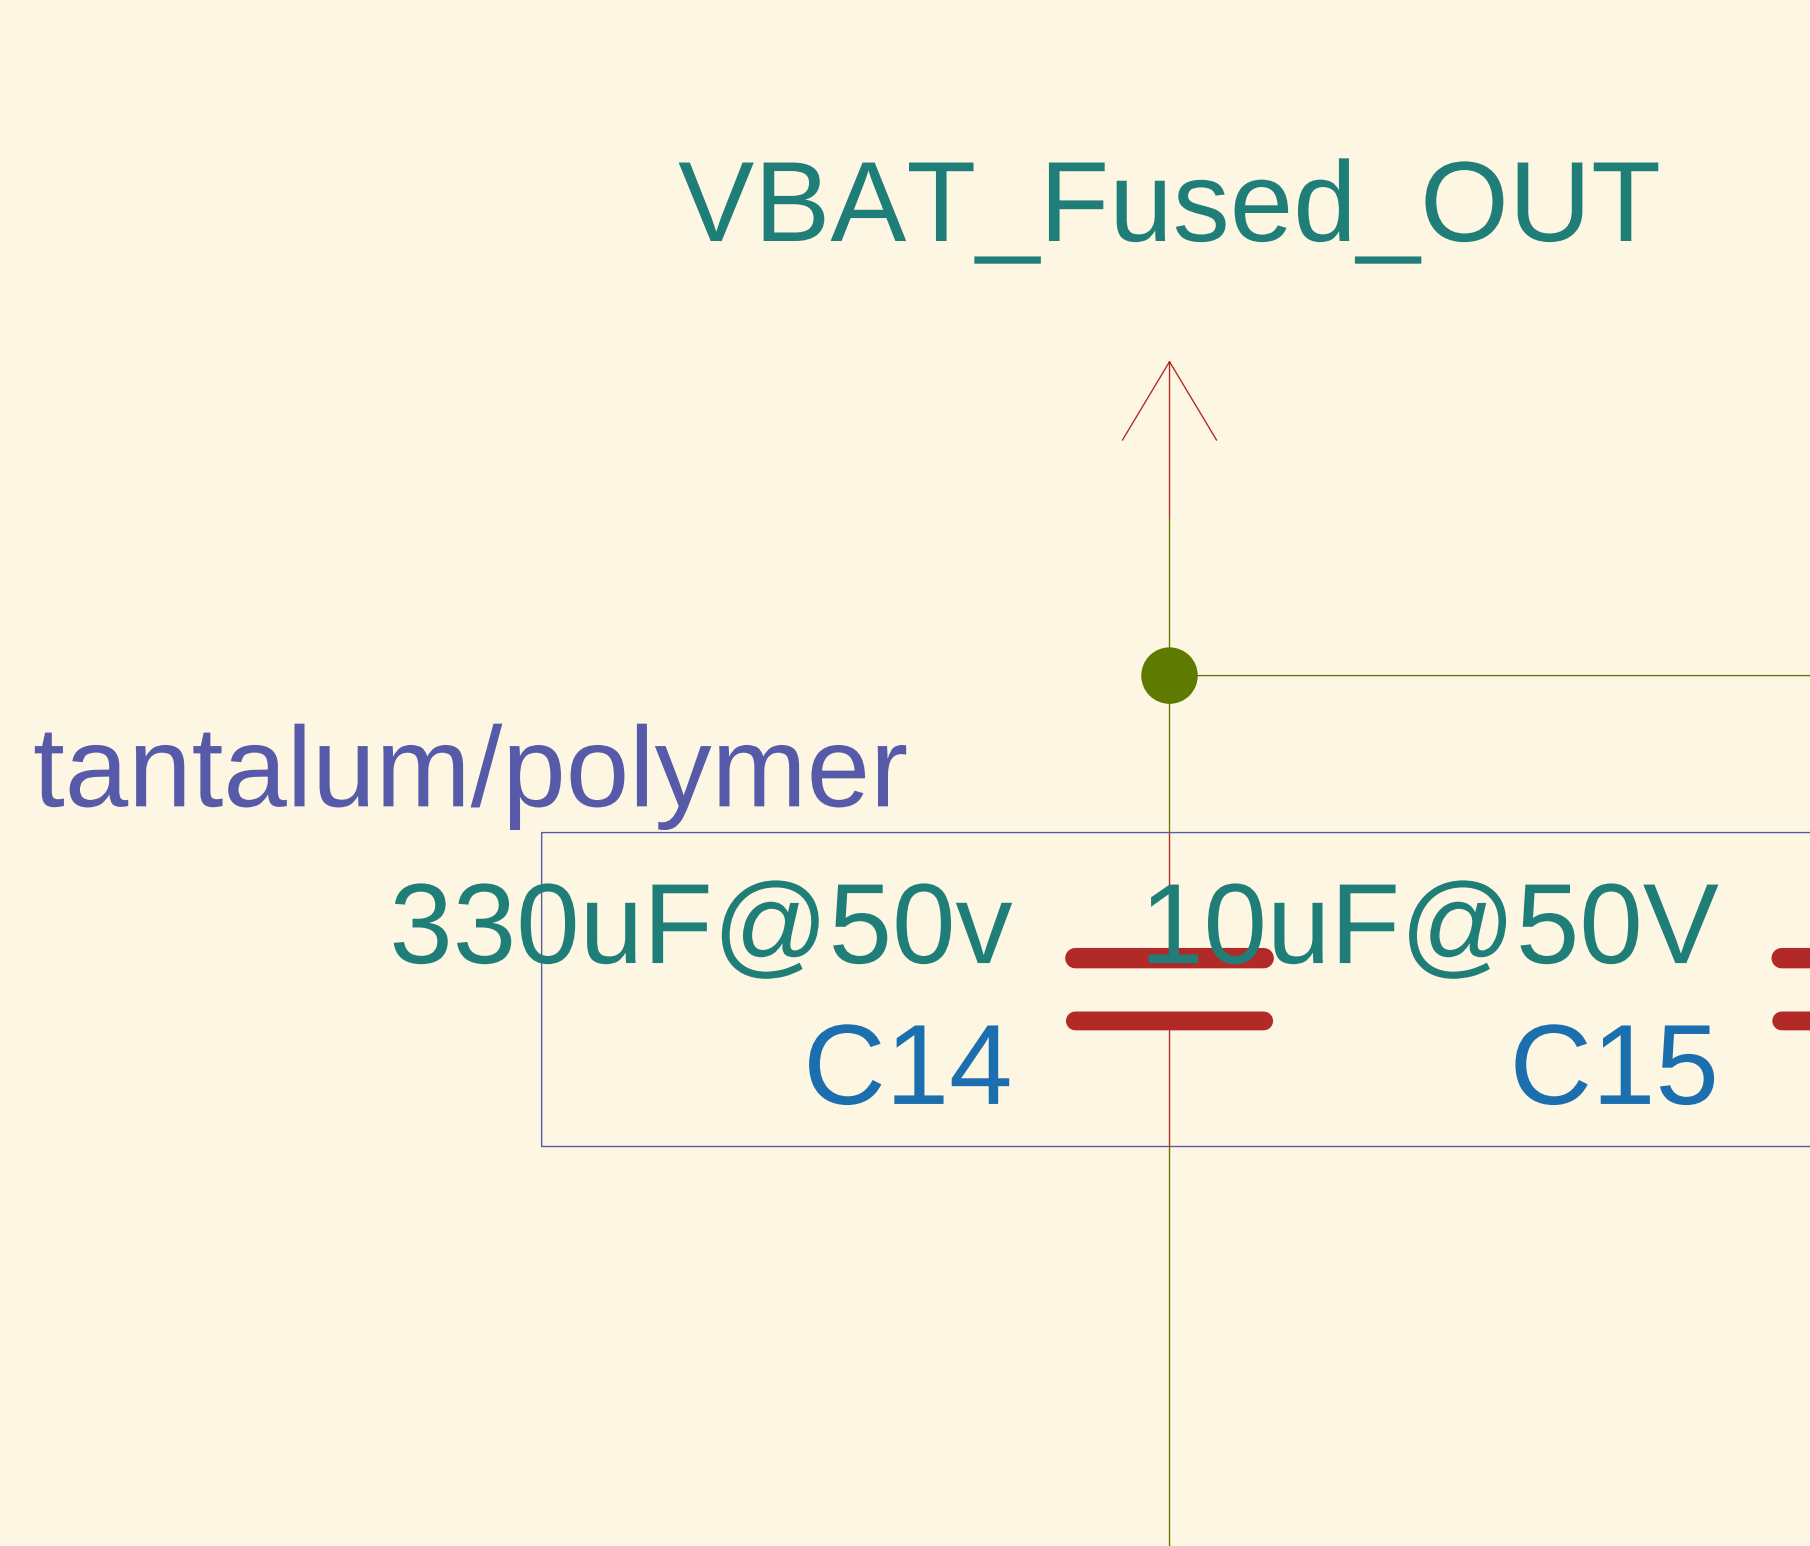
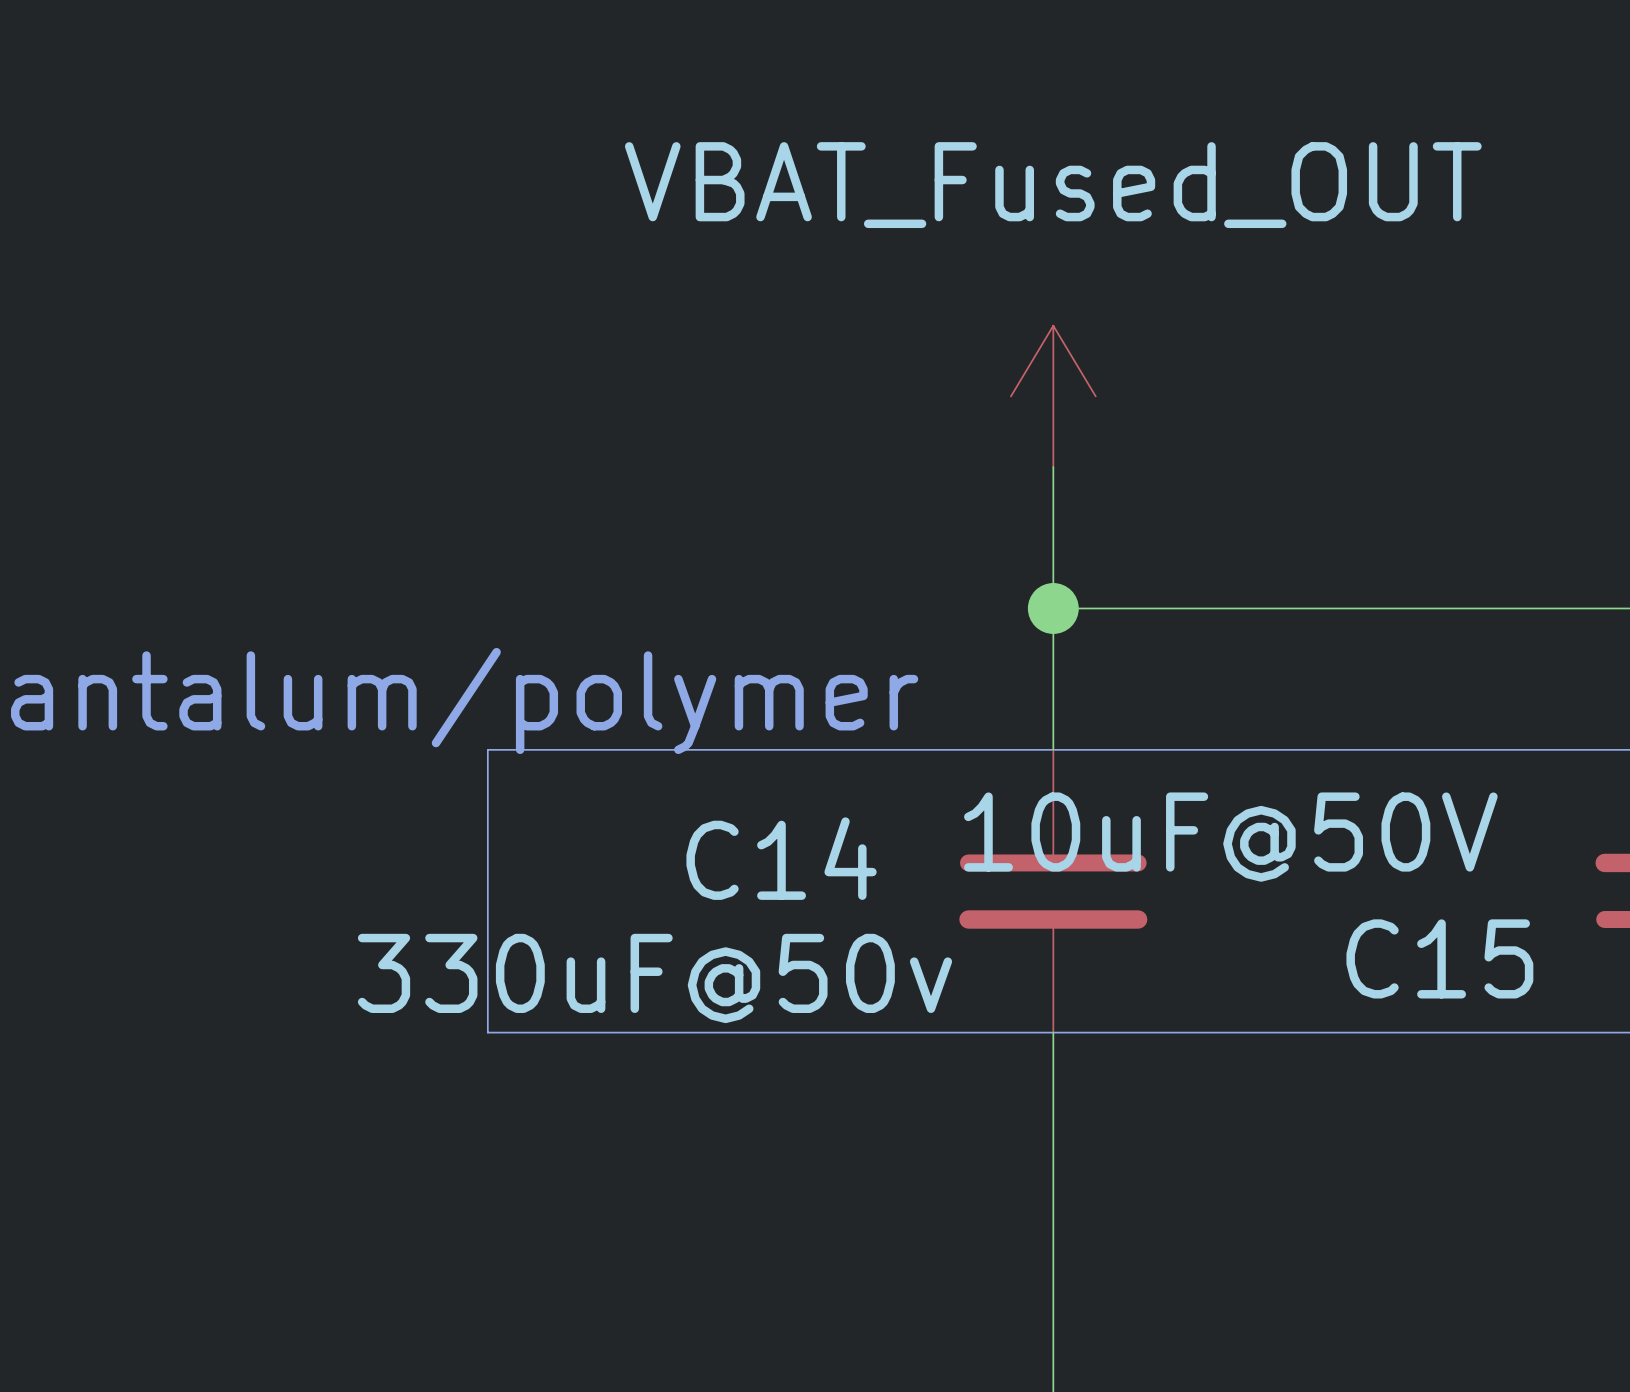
C14 value position: 330uF@50v (702, 929) -> 330uF@50v (654, 978)
C15 value position: 10uF@50V (1433, 929) -> 10uF@50V (1230, 837)
C14 rotation: 0° (1169, 989) -> 180° (1053, 891)

